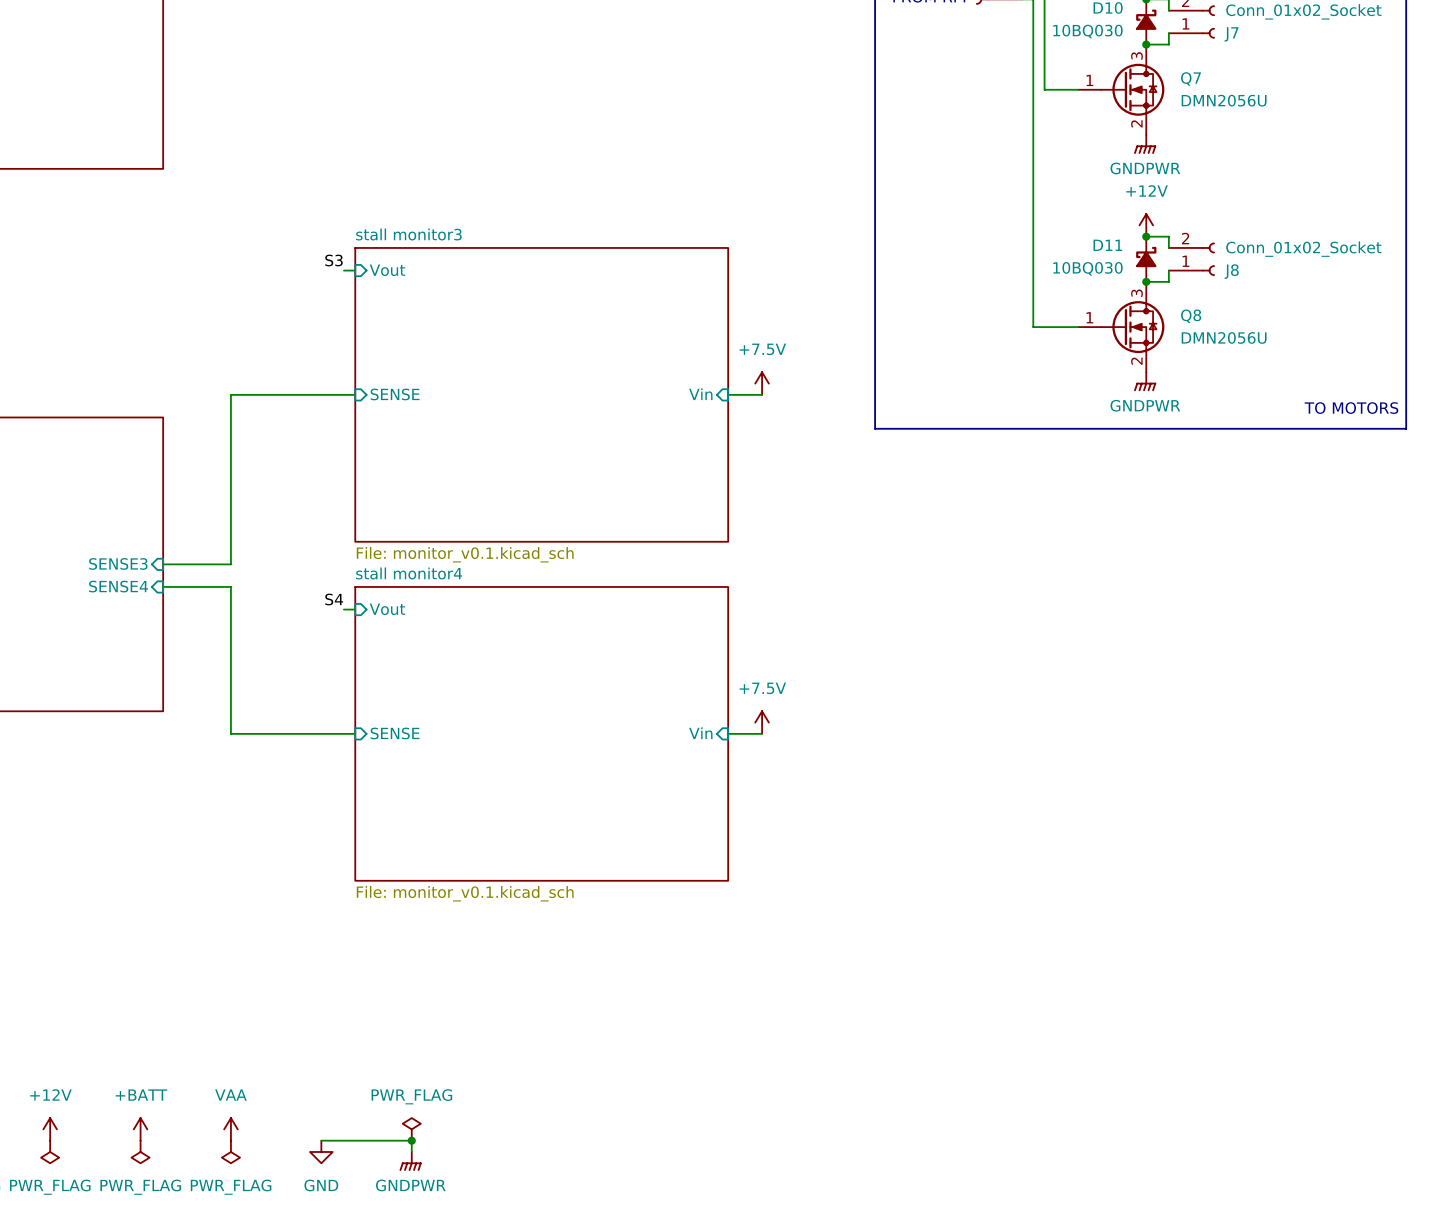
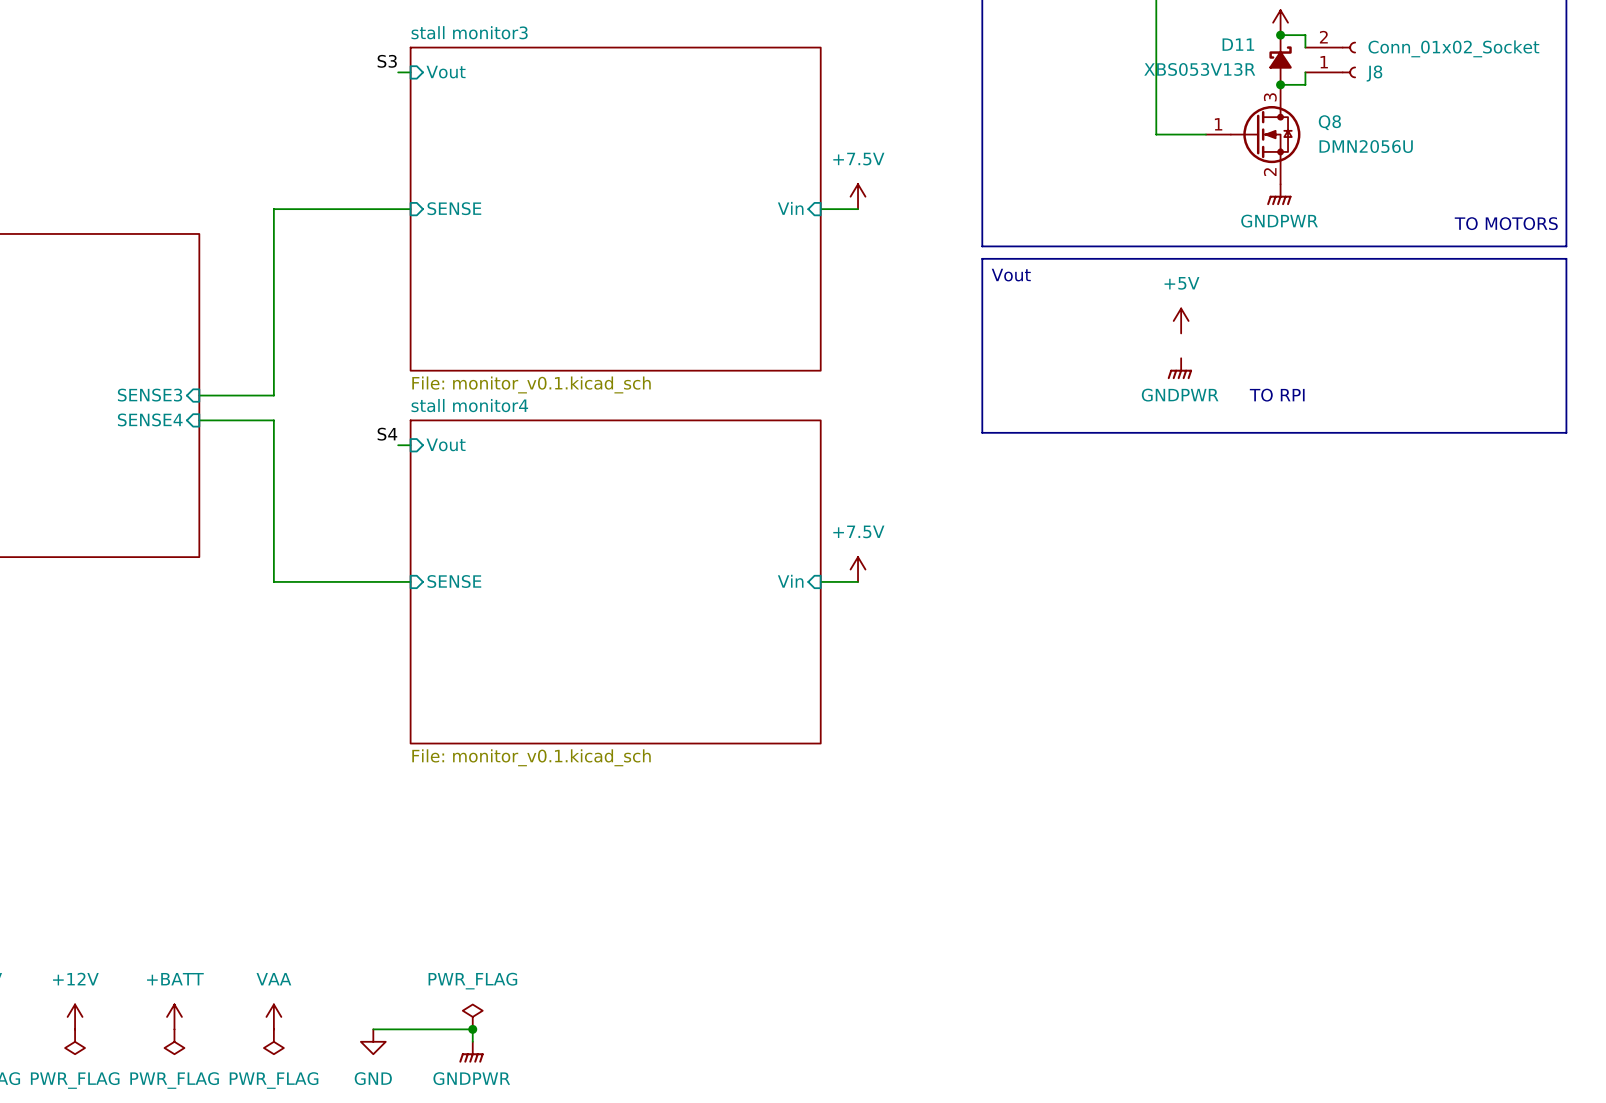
D11 value: 10BQ030 (1087, 268) -> XBS053V13R (1199, 69)
line: none -> (982, 258) (1566, 258) (1566, 432) (982, 432) (982, 258)
text: none -> Vout (1011, 275)
power symbol: none -> +5V (1181, 320)
power symbol: none -> GNDPWR (1179, 368)
text: none -> TO RPI (1277, 395)

